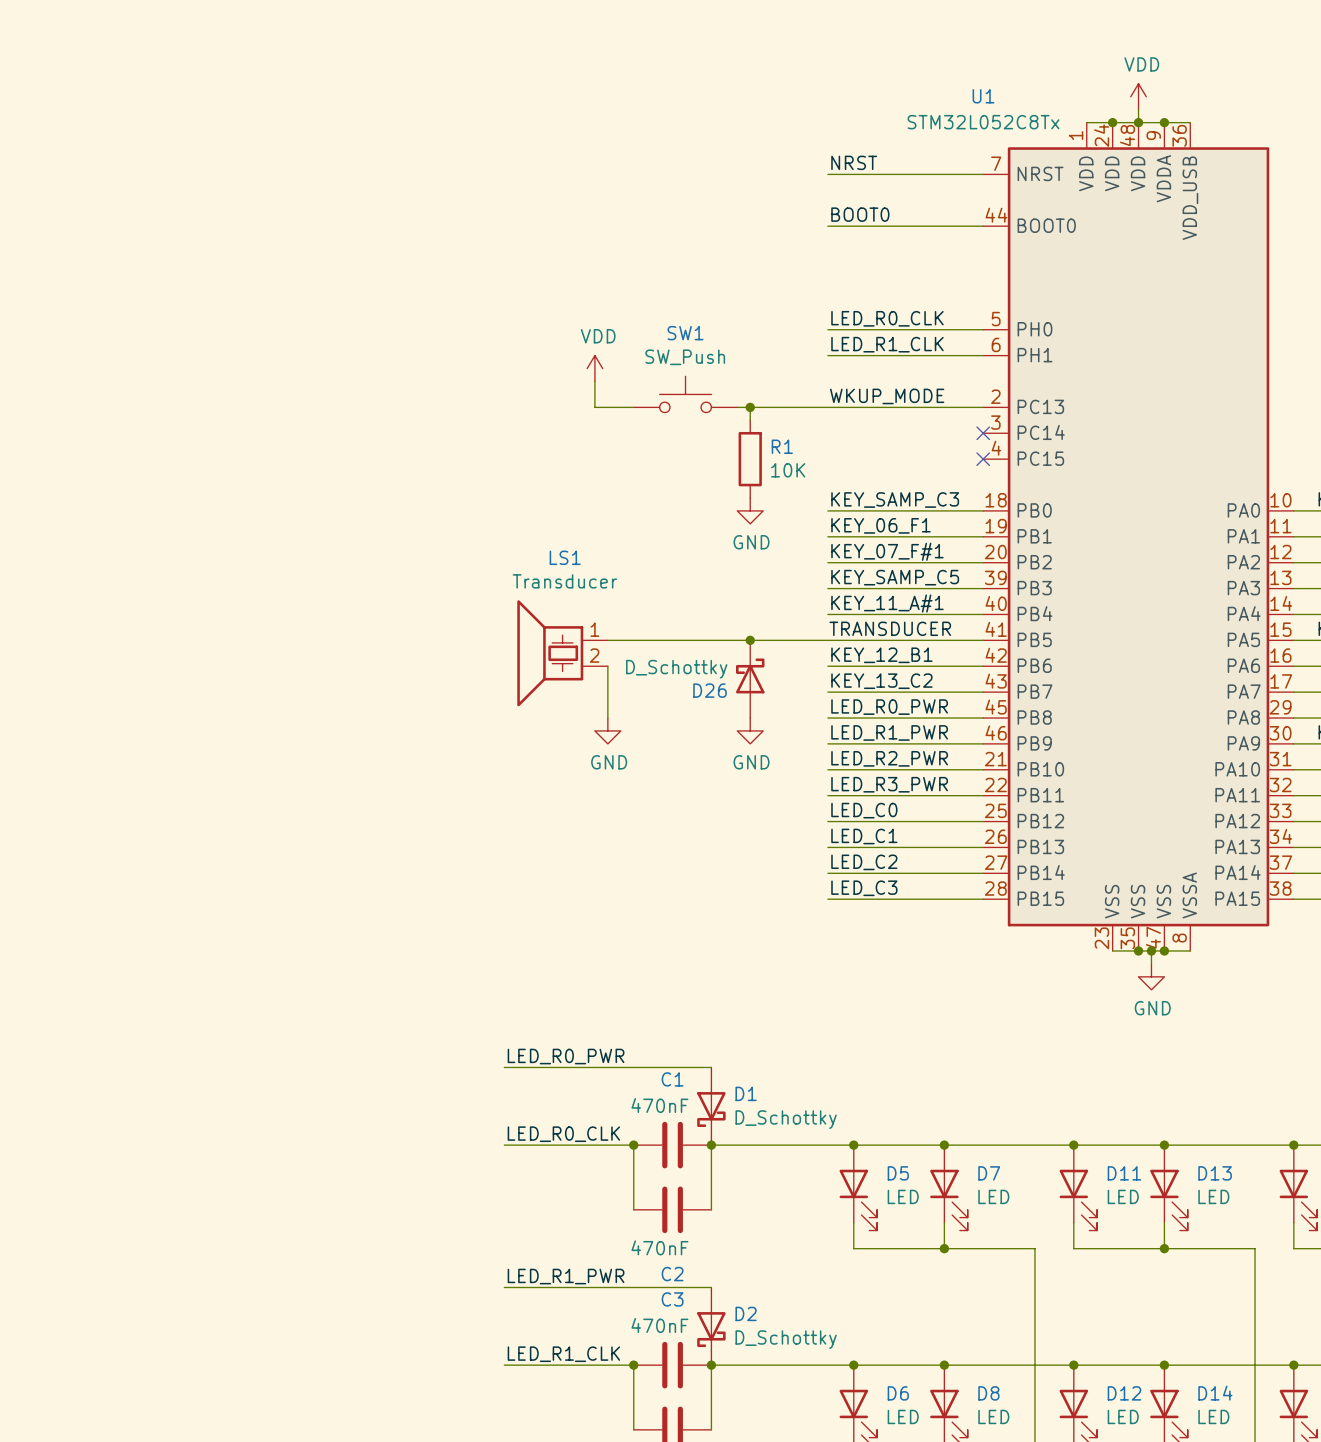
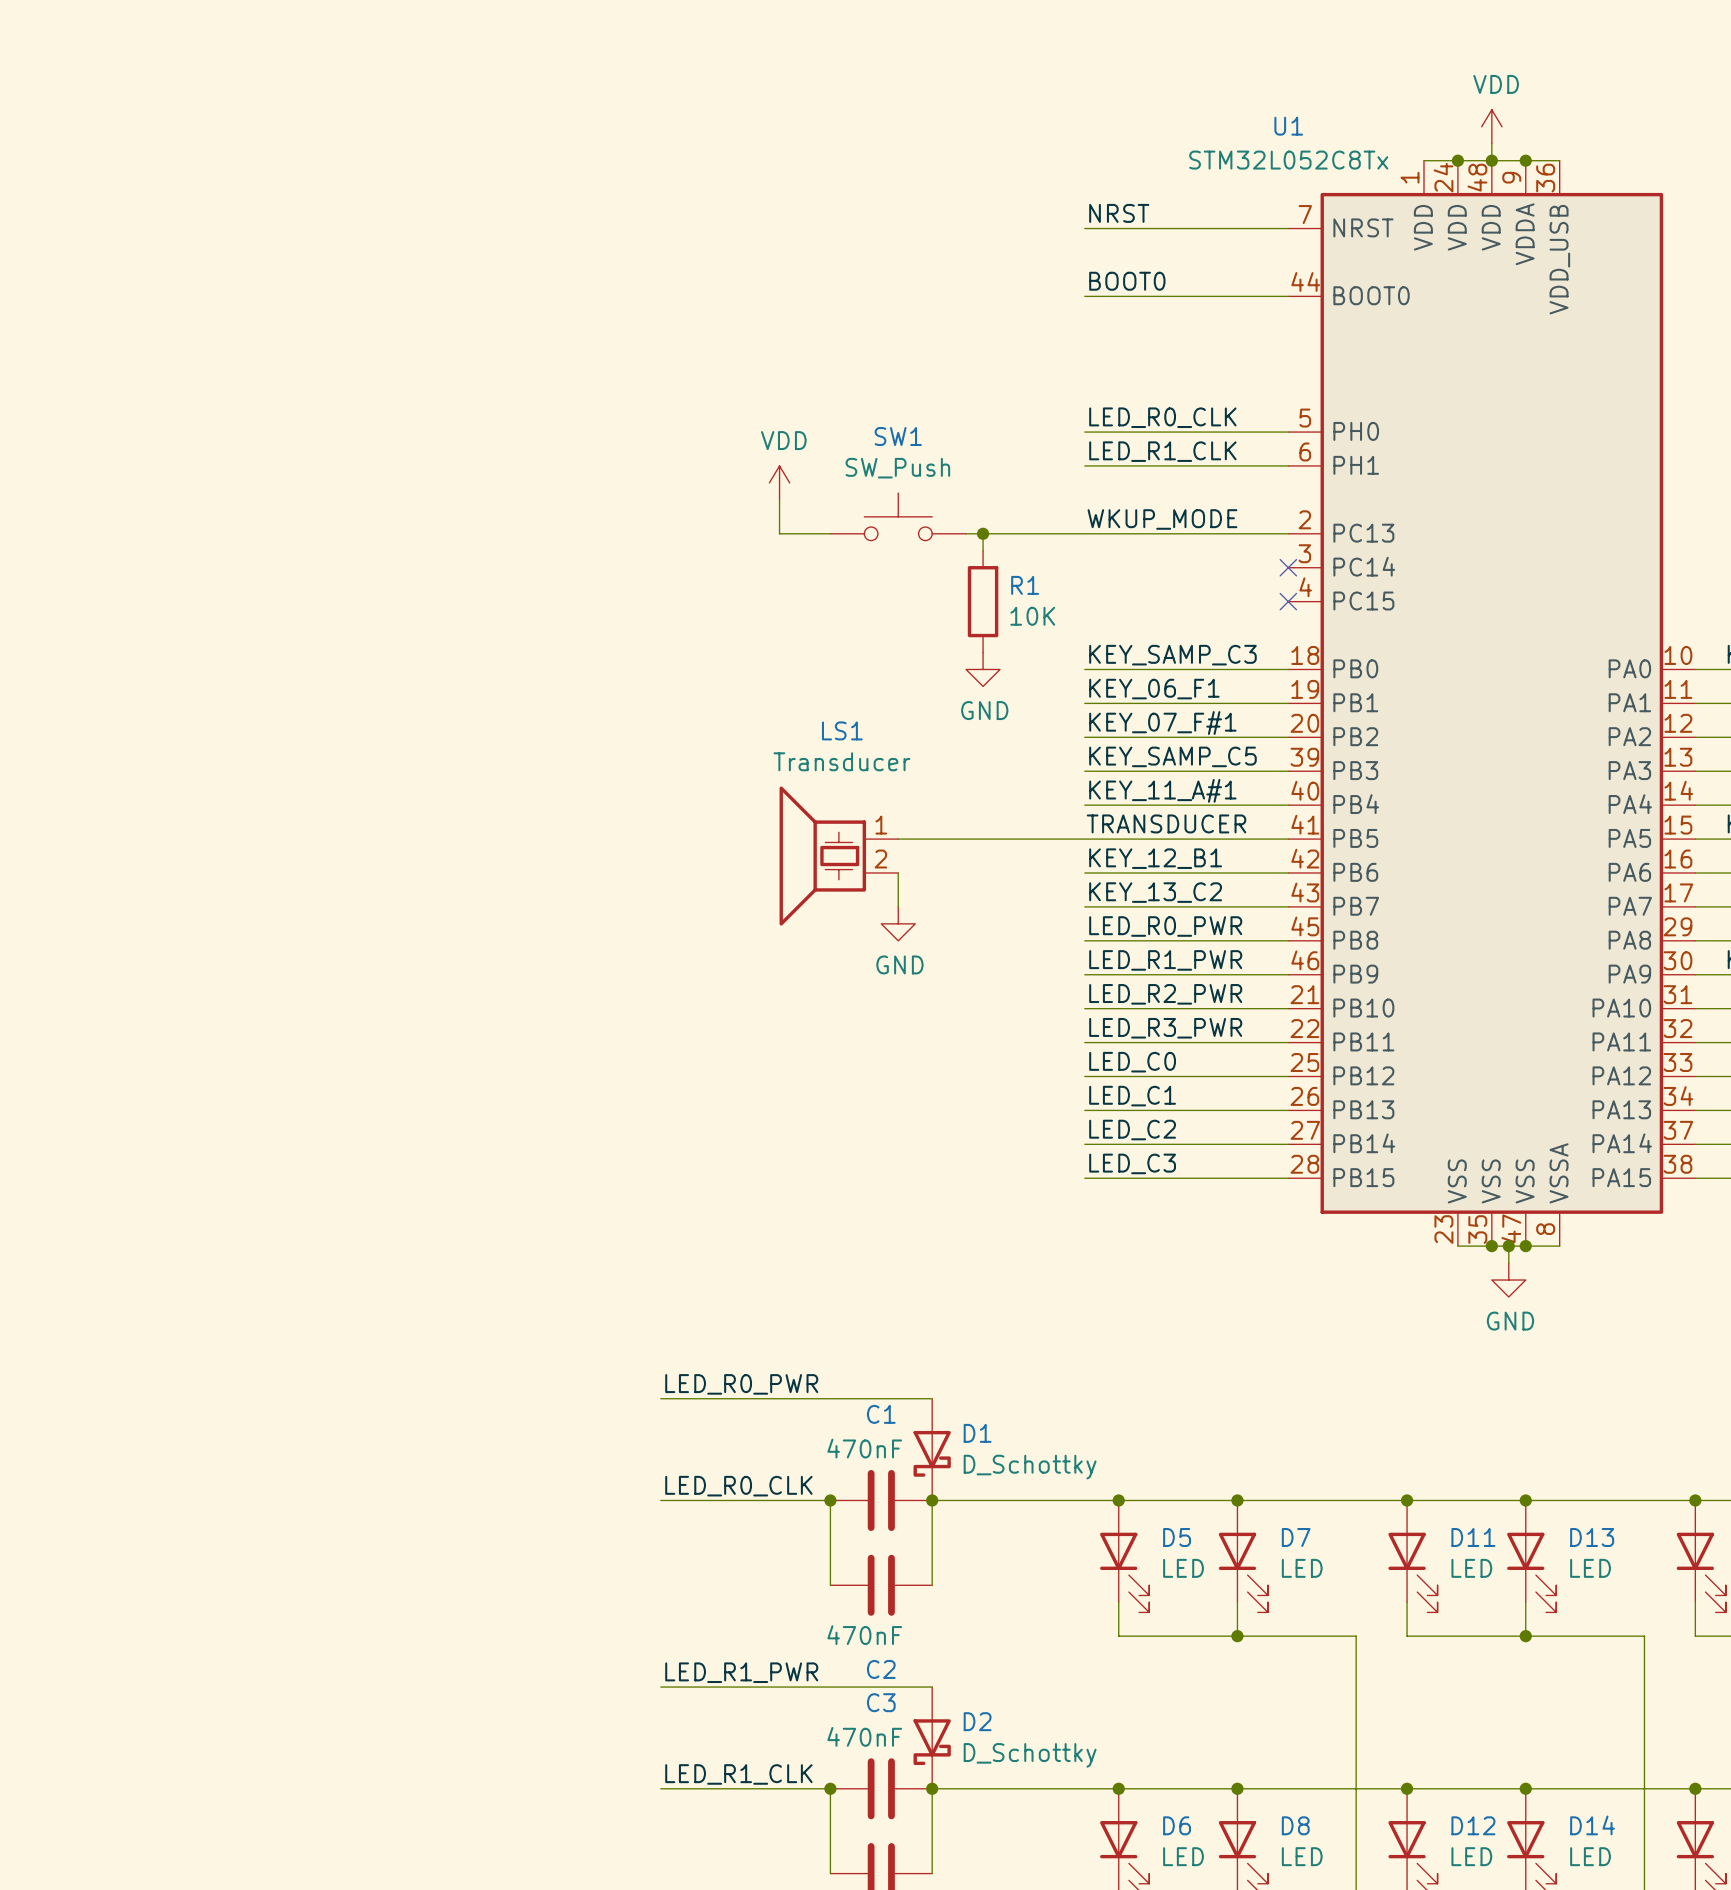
wire: (607, 640) (685, 640) -> none
junction: (750, 640) -> none
LS1 position: (562, 653) -> (838, 856)
wire: (607, 666) (607, 718) -> none
wire: none -> (898, 872) (898, 906)
D26: D_Schottky (750, 679) -> none
power symbol: none -> GND (898, 923)
power symbol: GND (607, 730) -> none
power symbol: GND (750, 730) -> none

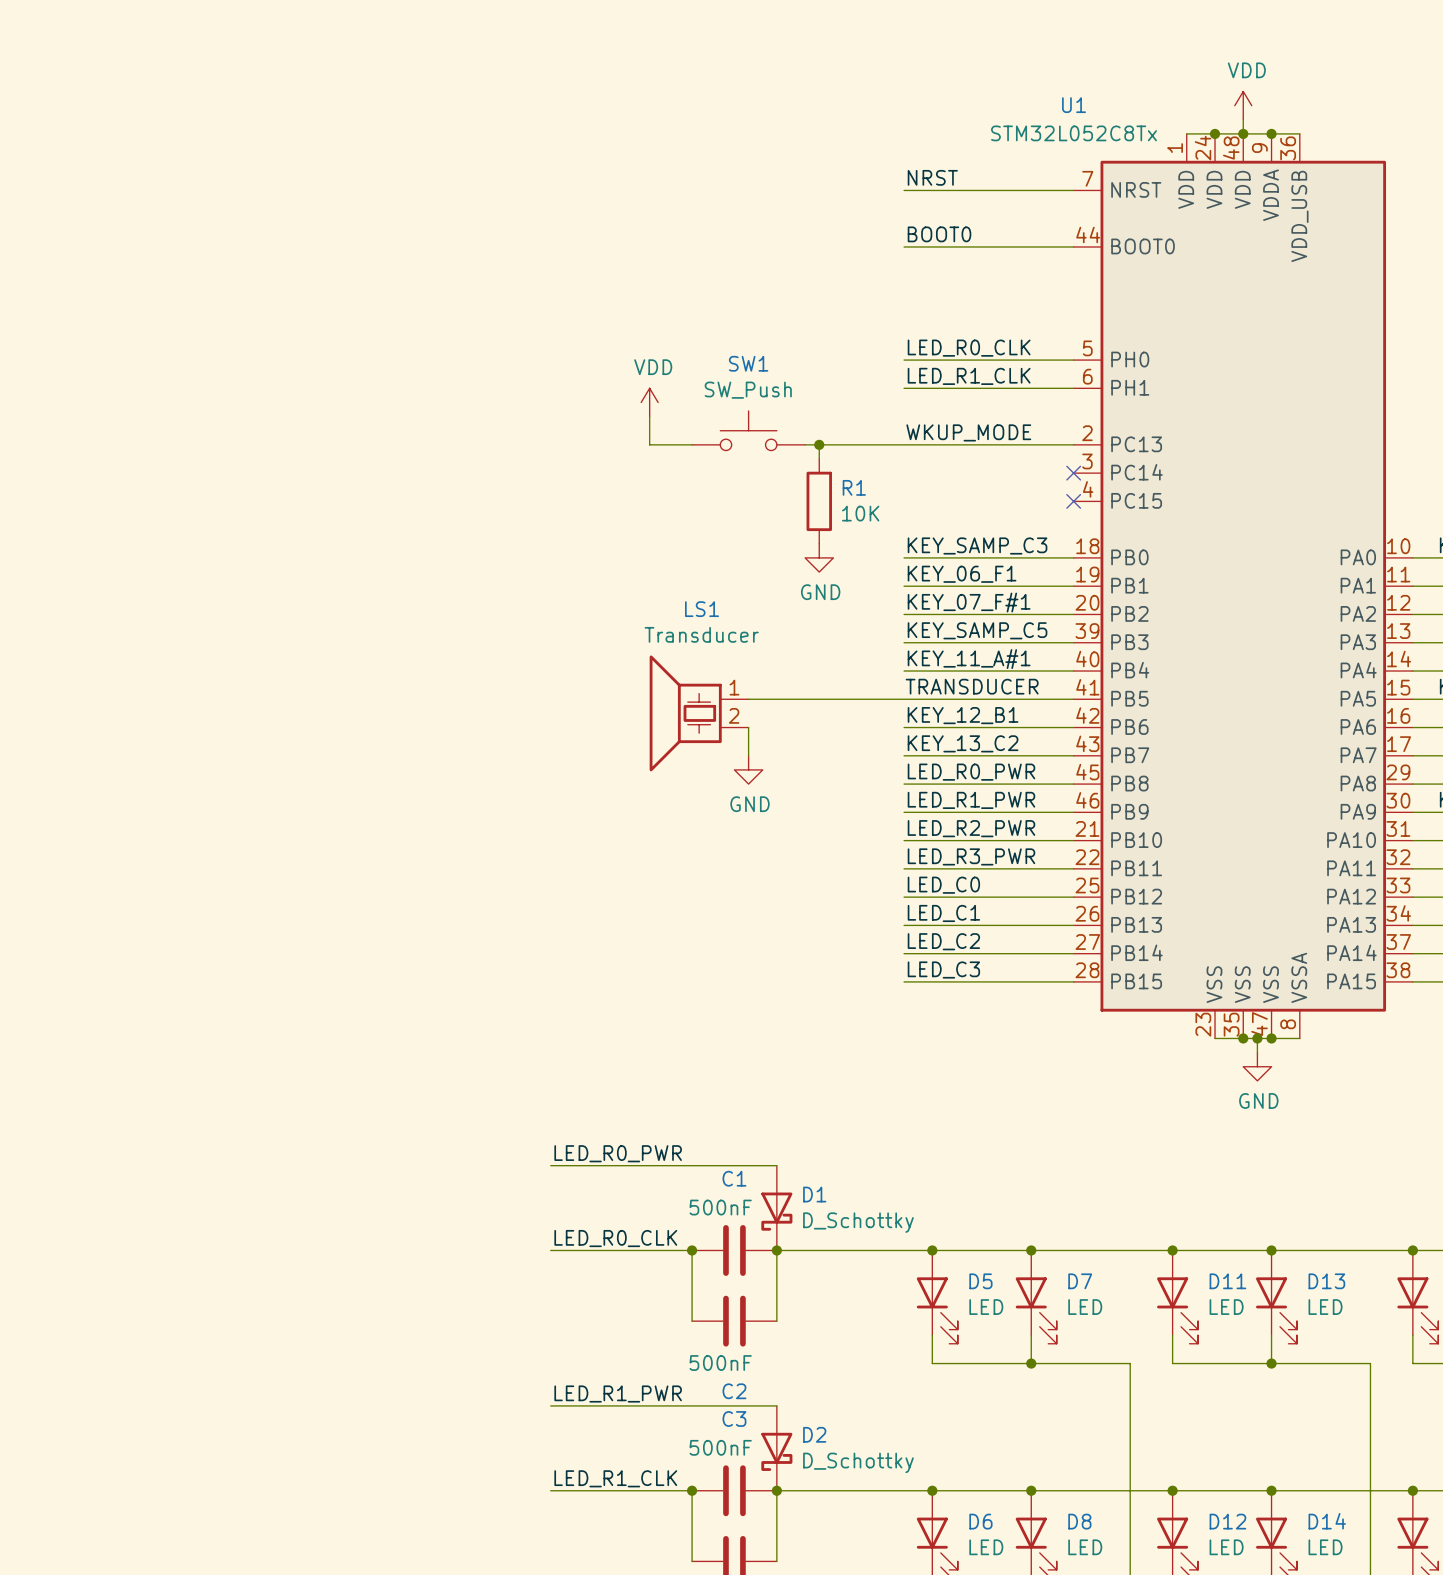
C1 value: 470nF (864, 1448) -> 500nF (720, 1207)
C2 value: 470nF (864, 1635) -> 500nF (720, 1363)
C3 value: 470nF (864, 1736) -> 500nF (720, 1447)

